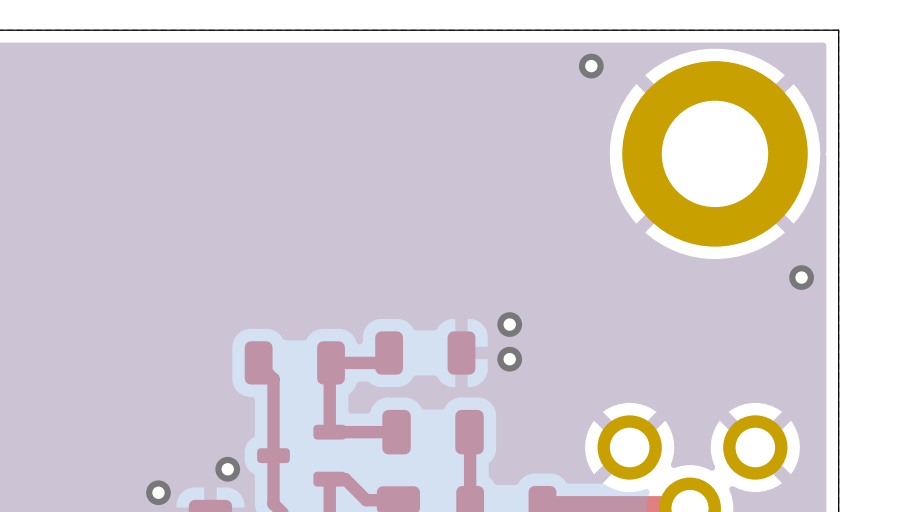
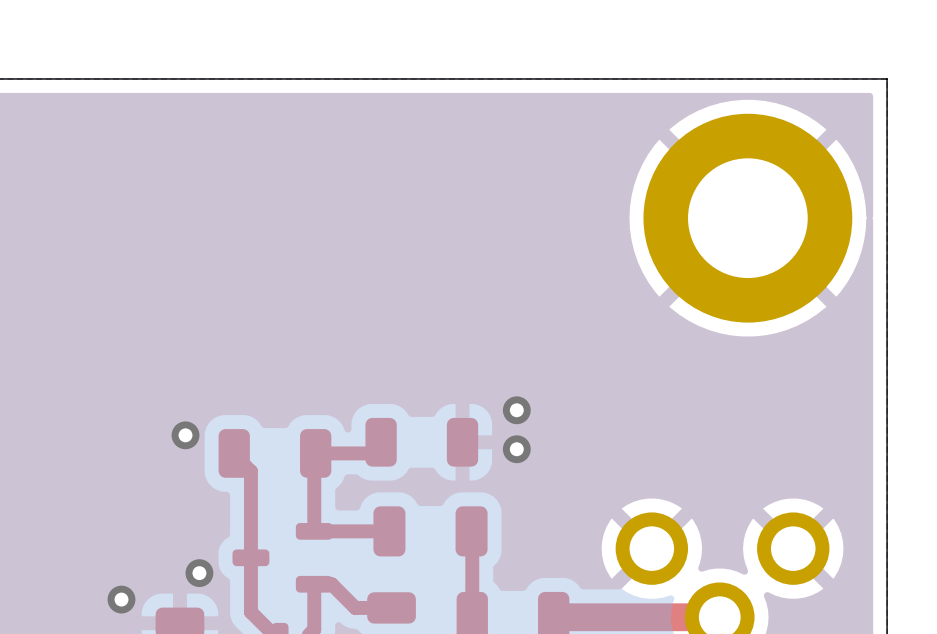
via: (591, 66) -> none
via: (801, 277) -> none
via: none -> (185, 435)

